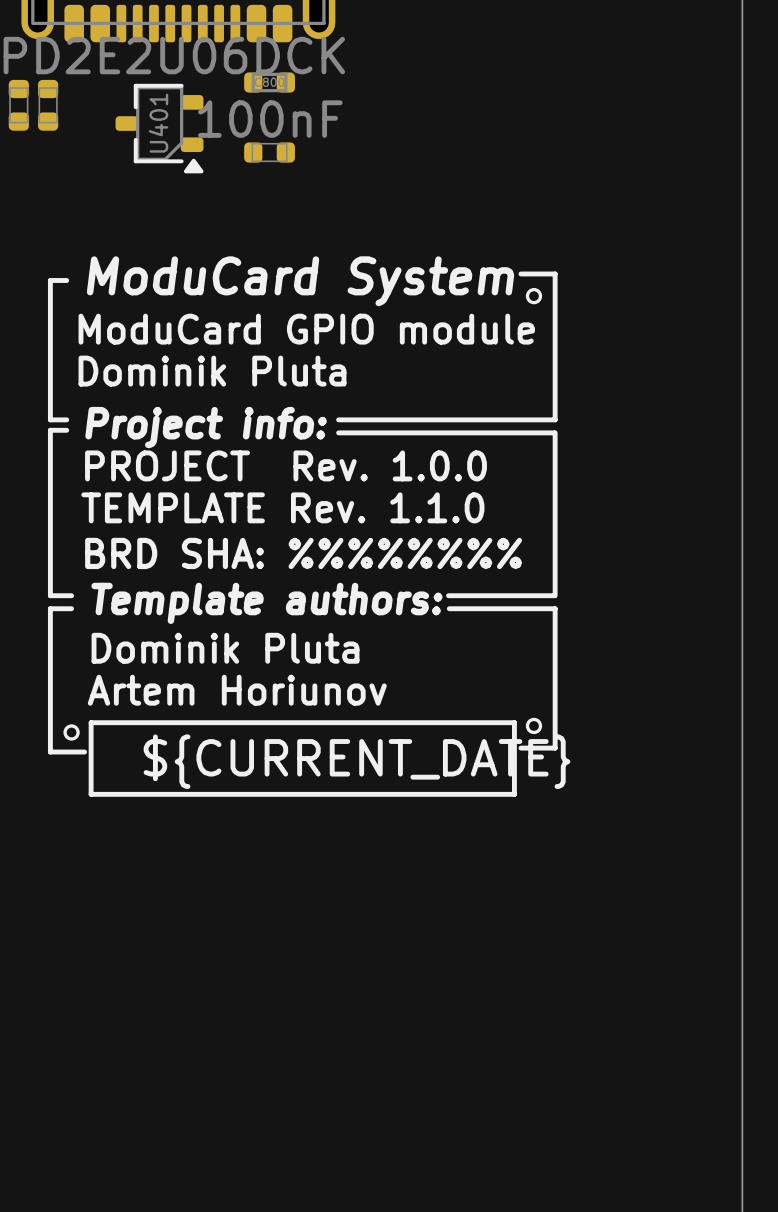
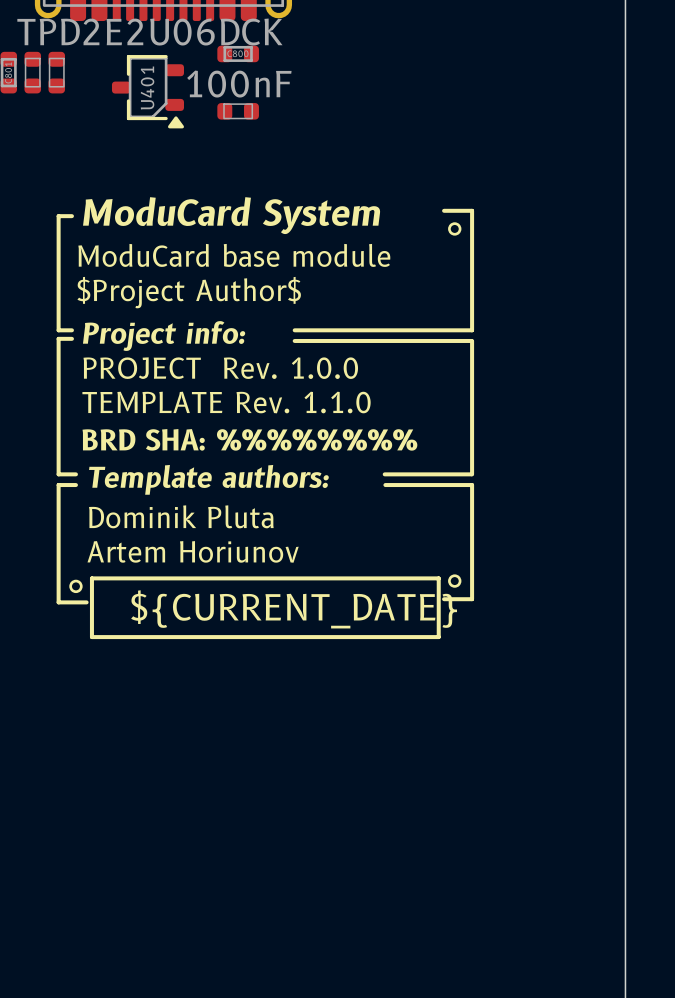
text: ModuCard GPIO module (306, 329) -> ModuCard base module (234, 255)
text: Dominik Pluta (212, 371) -> $Project Author$ (189, 292)

